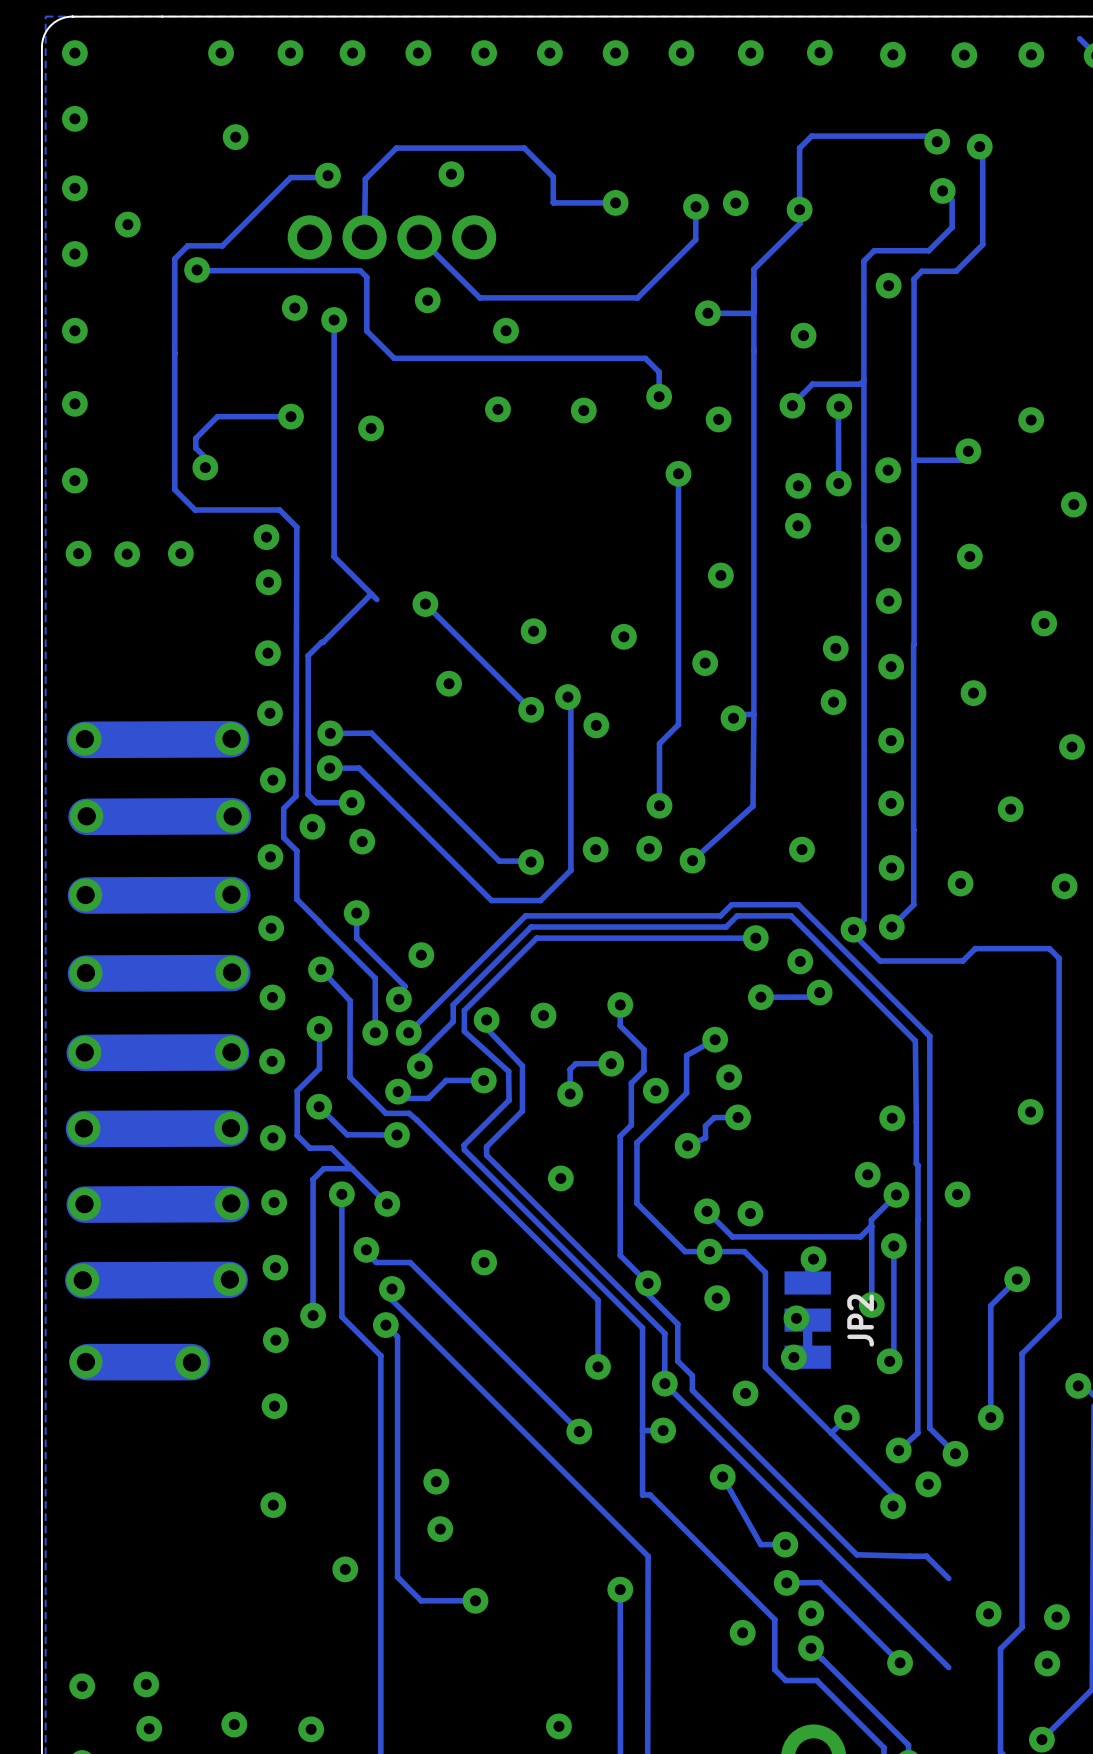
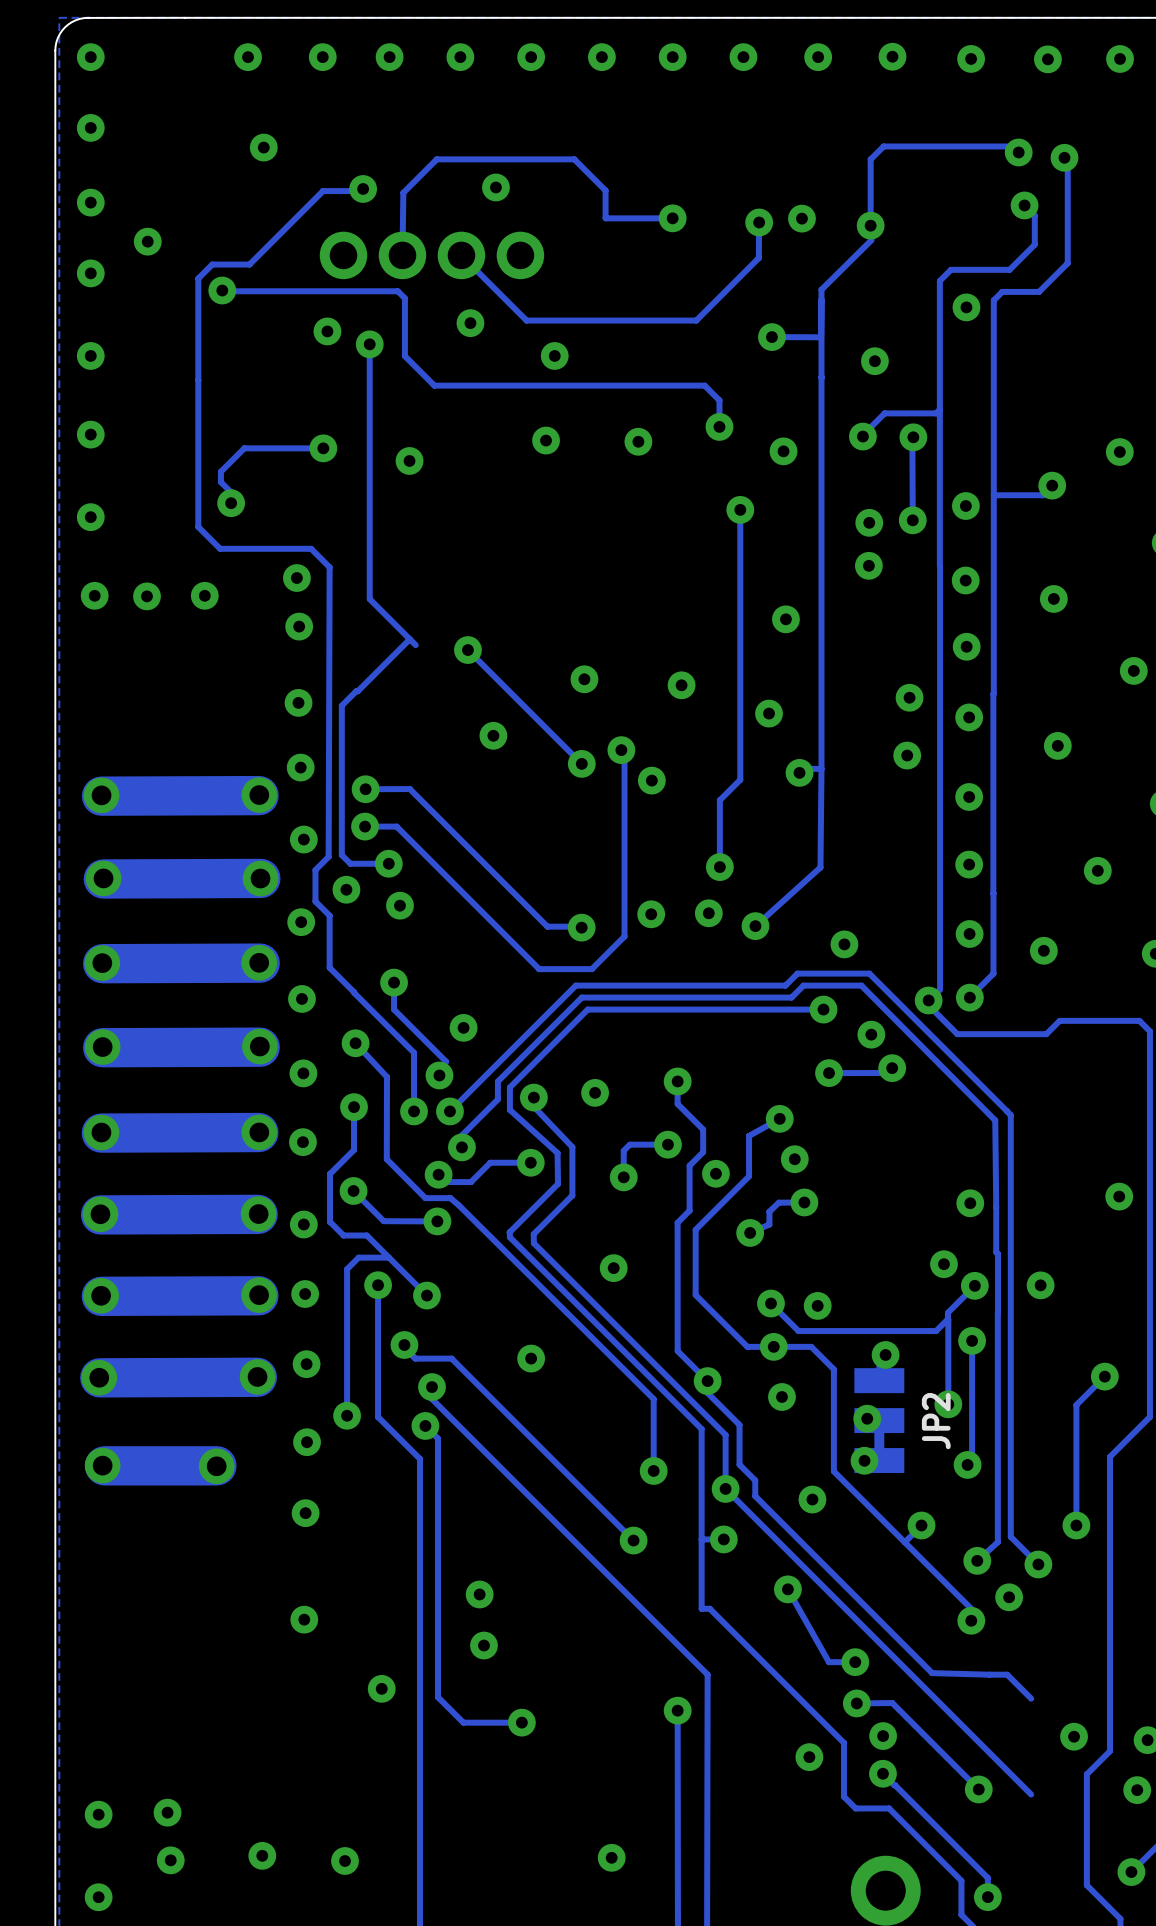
via position: (801, 849) -> (844, 944)

